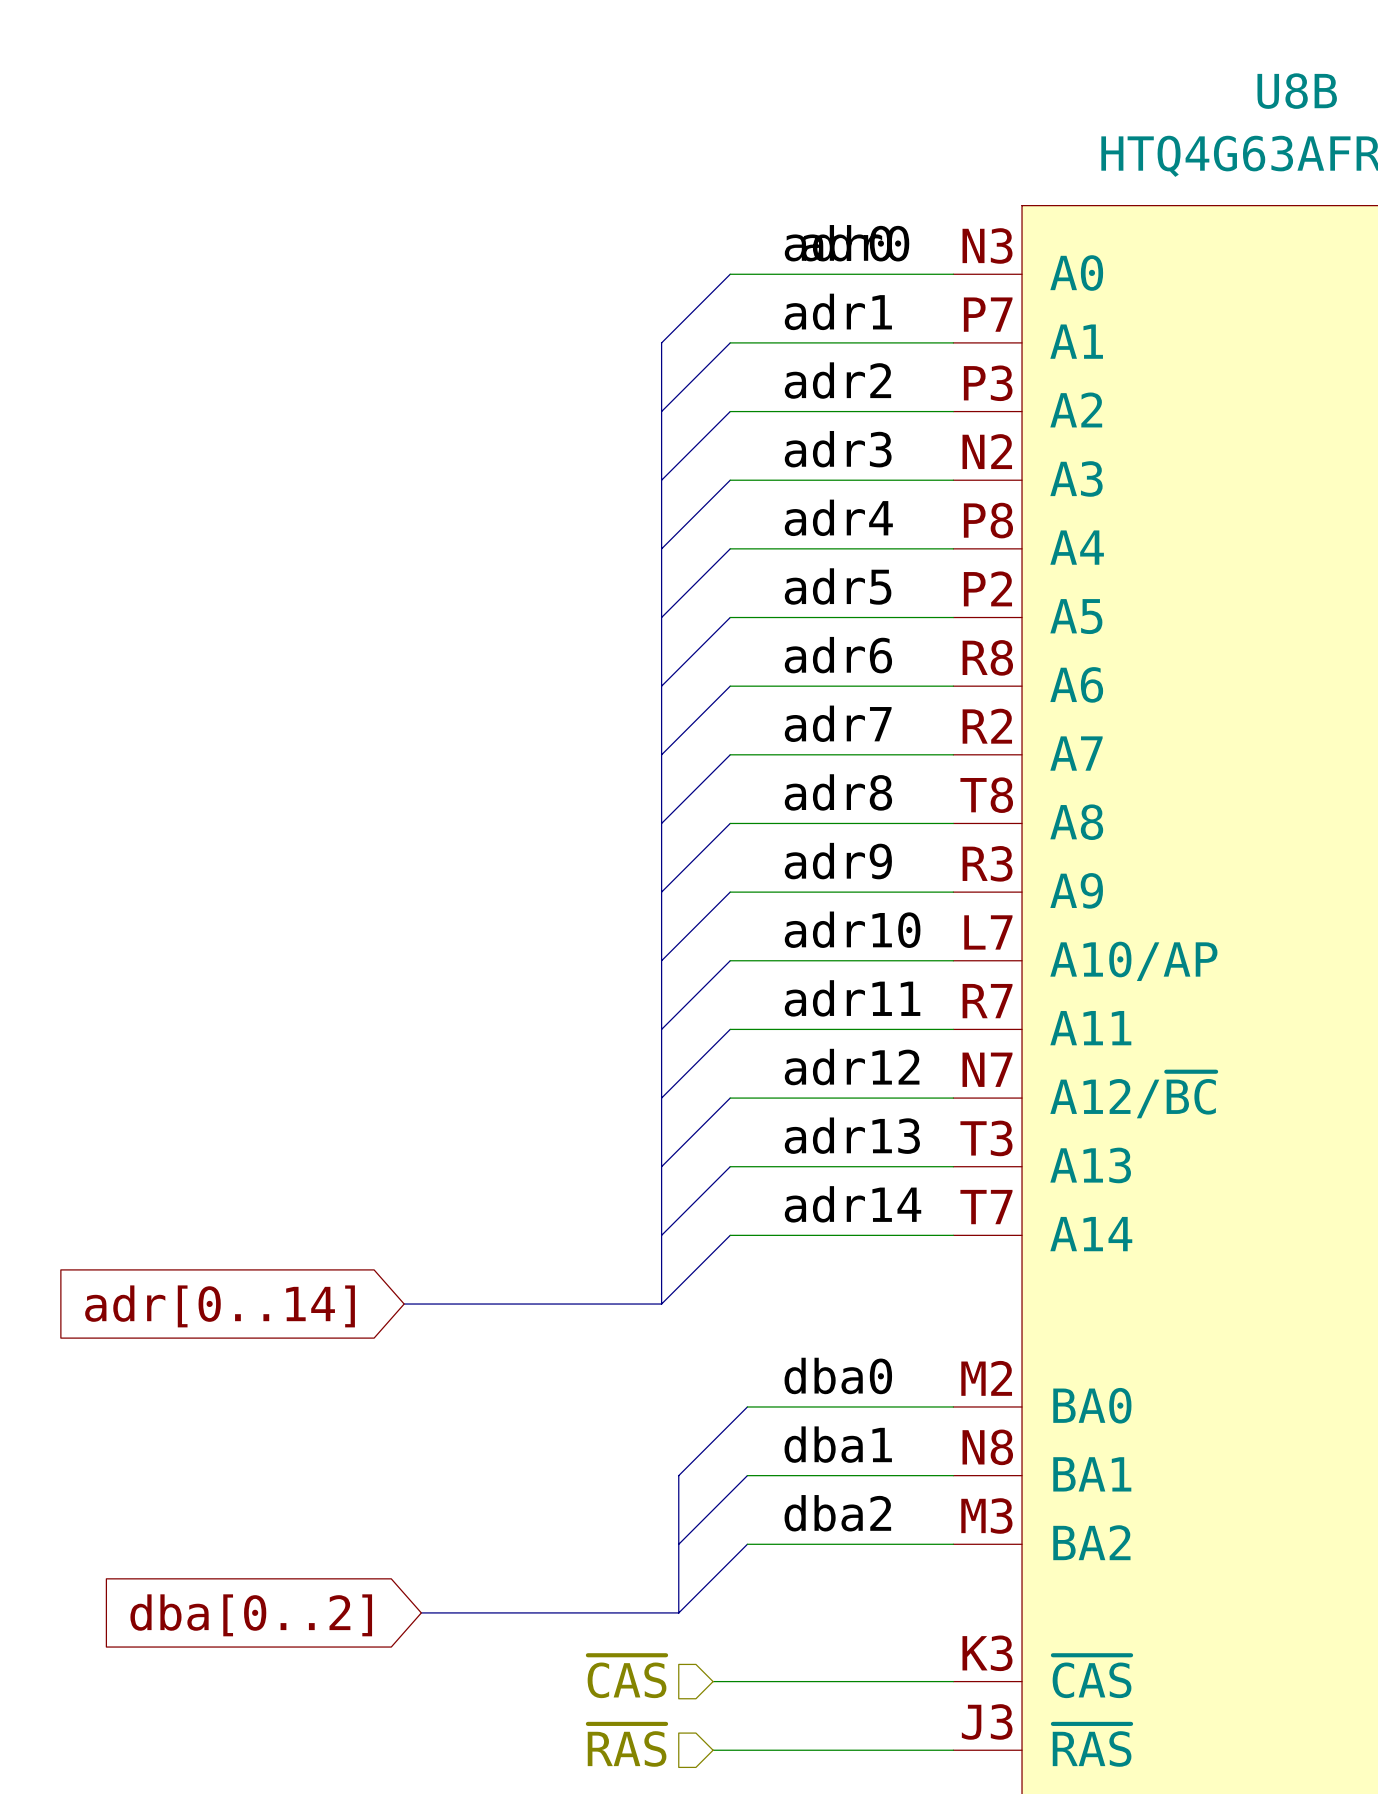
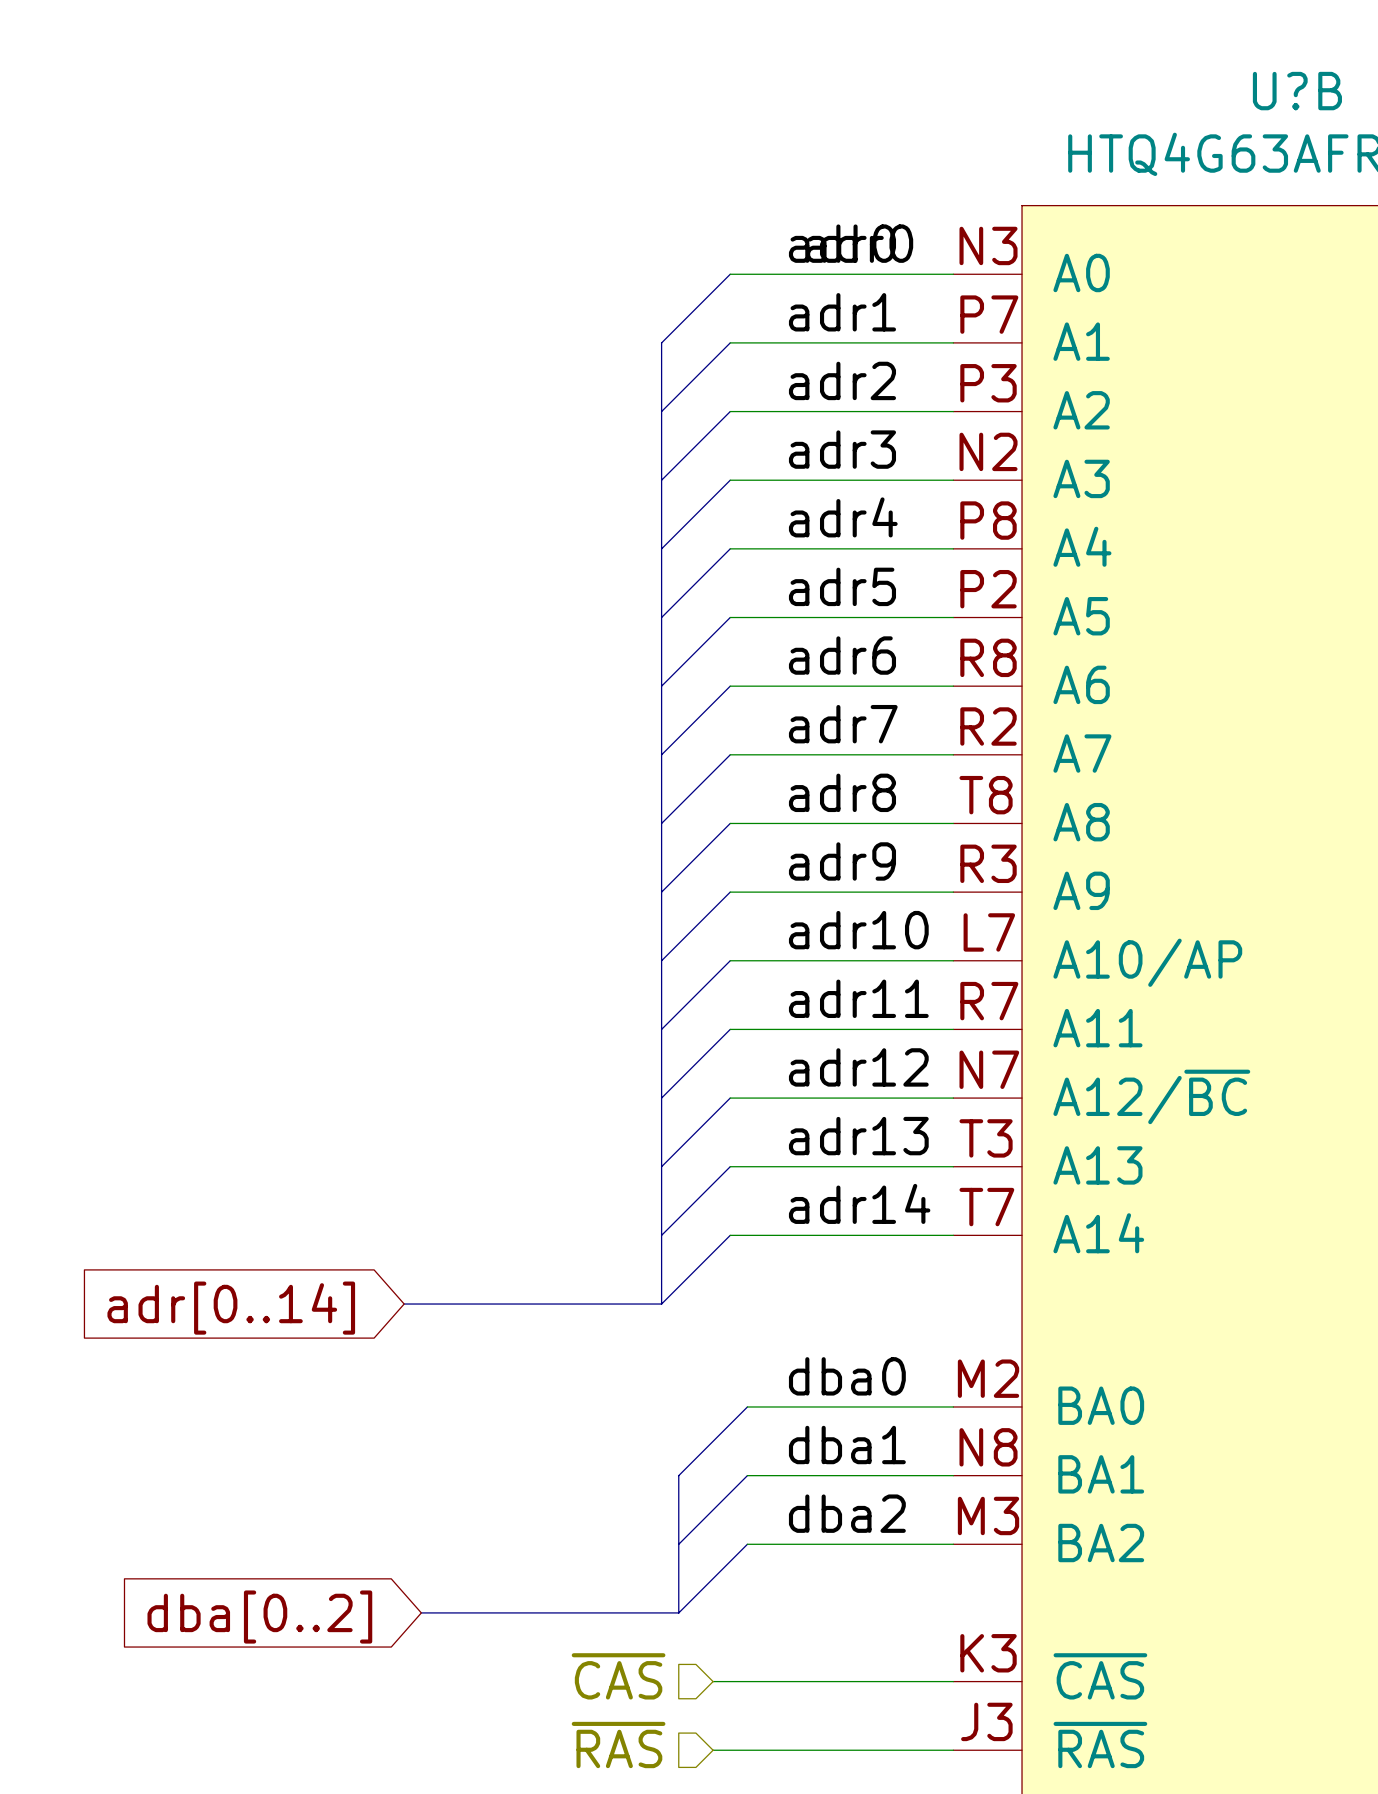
U8B name: U8B (1297, 91) -> U?B (1297, 91)

